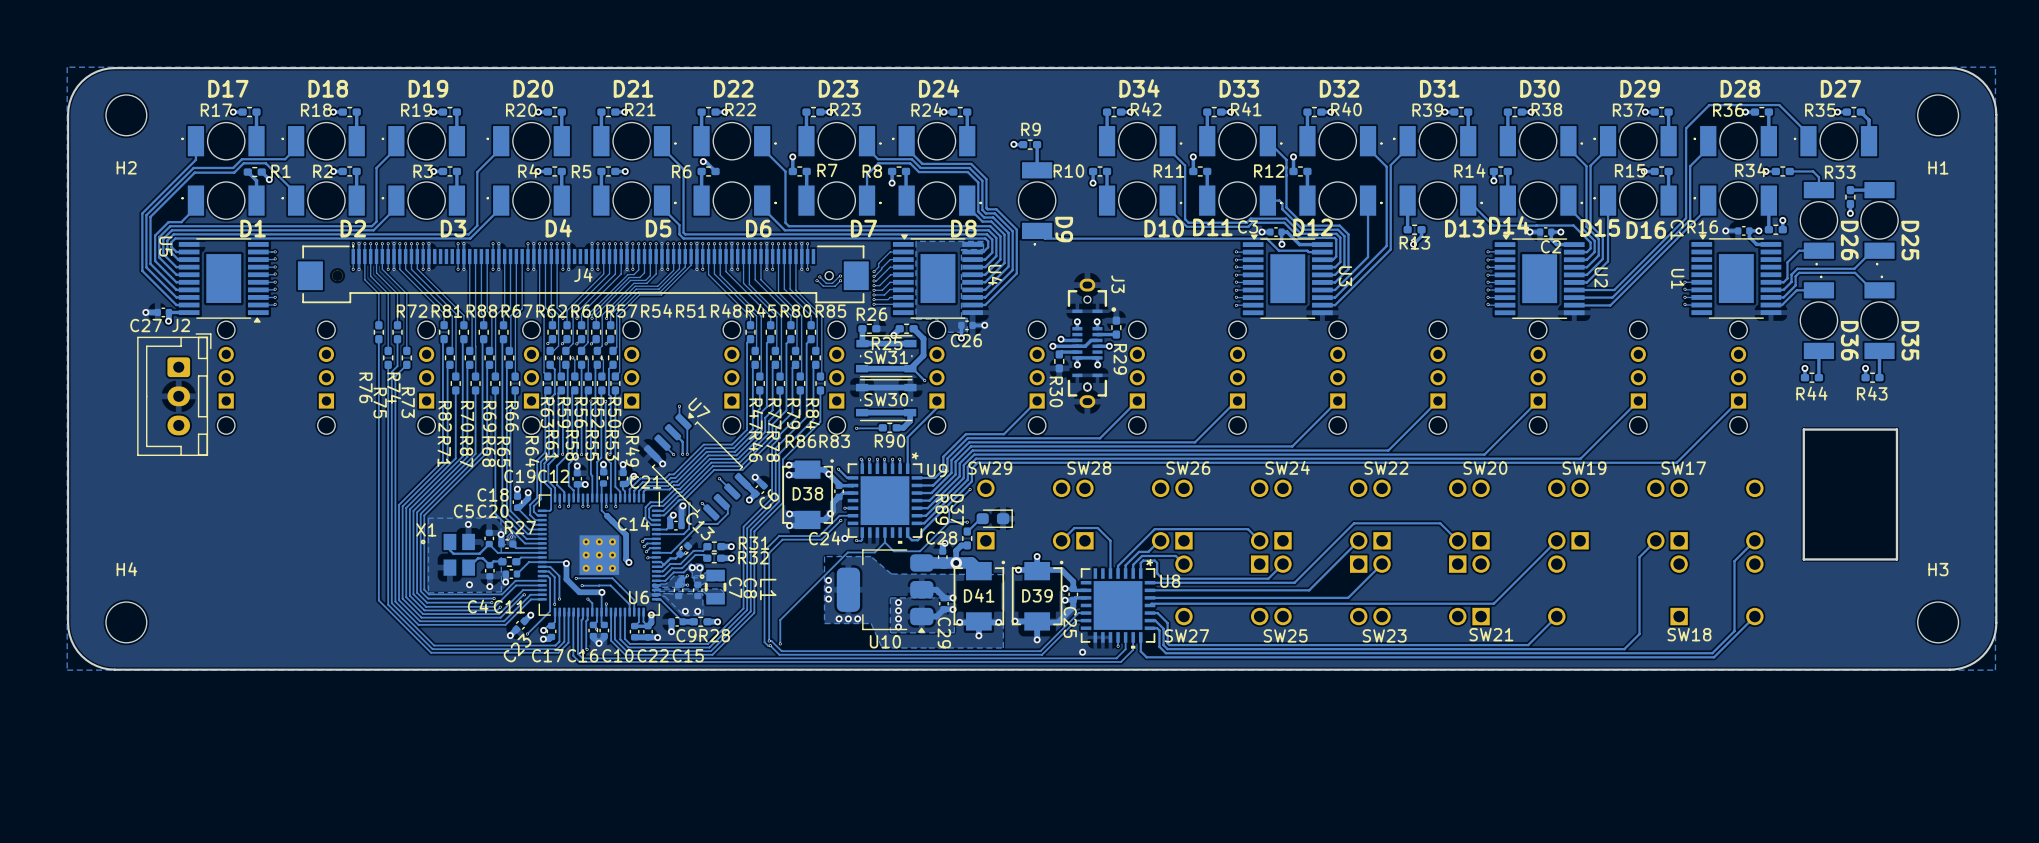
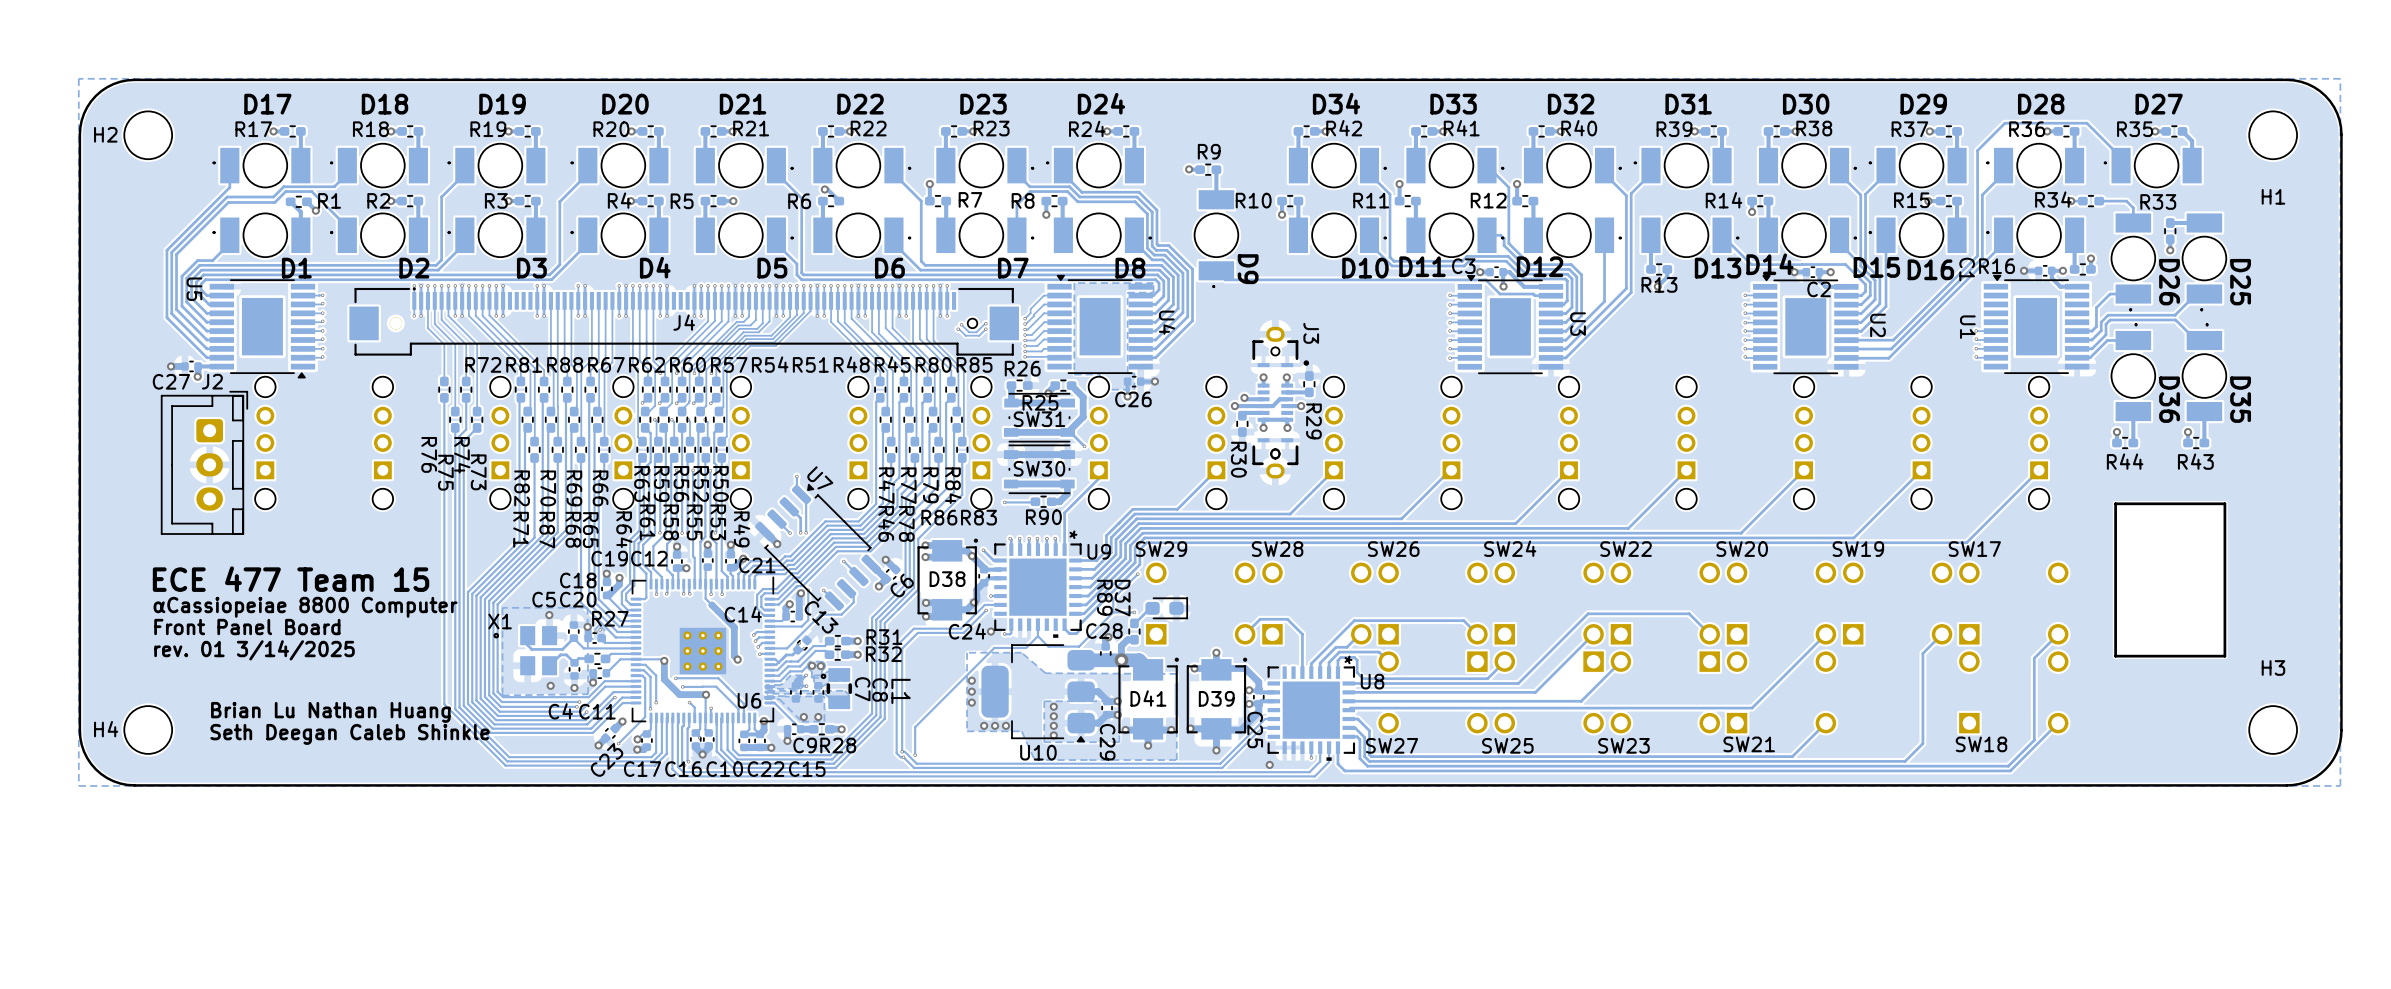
H2 name position: H2 (126, 167) -> H2 (105, 134)
text: none -> ECE 477 Team 15 (291, 579)
text: none -> αCassiopeiae 8800 Computer (305, 607)
text: none -> Front Panel Board (247, 627)
text: none -> rev. 01 3/14/2025 (254, 650)
H4 name position: H4 (126, 569) -> H4 (106, 729)
text: none -> Brian Lu Nathan Huang (330, 712)
text: none -> Seth Deegan Caleb Shinkle (350, 734)

